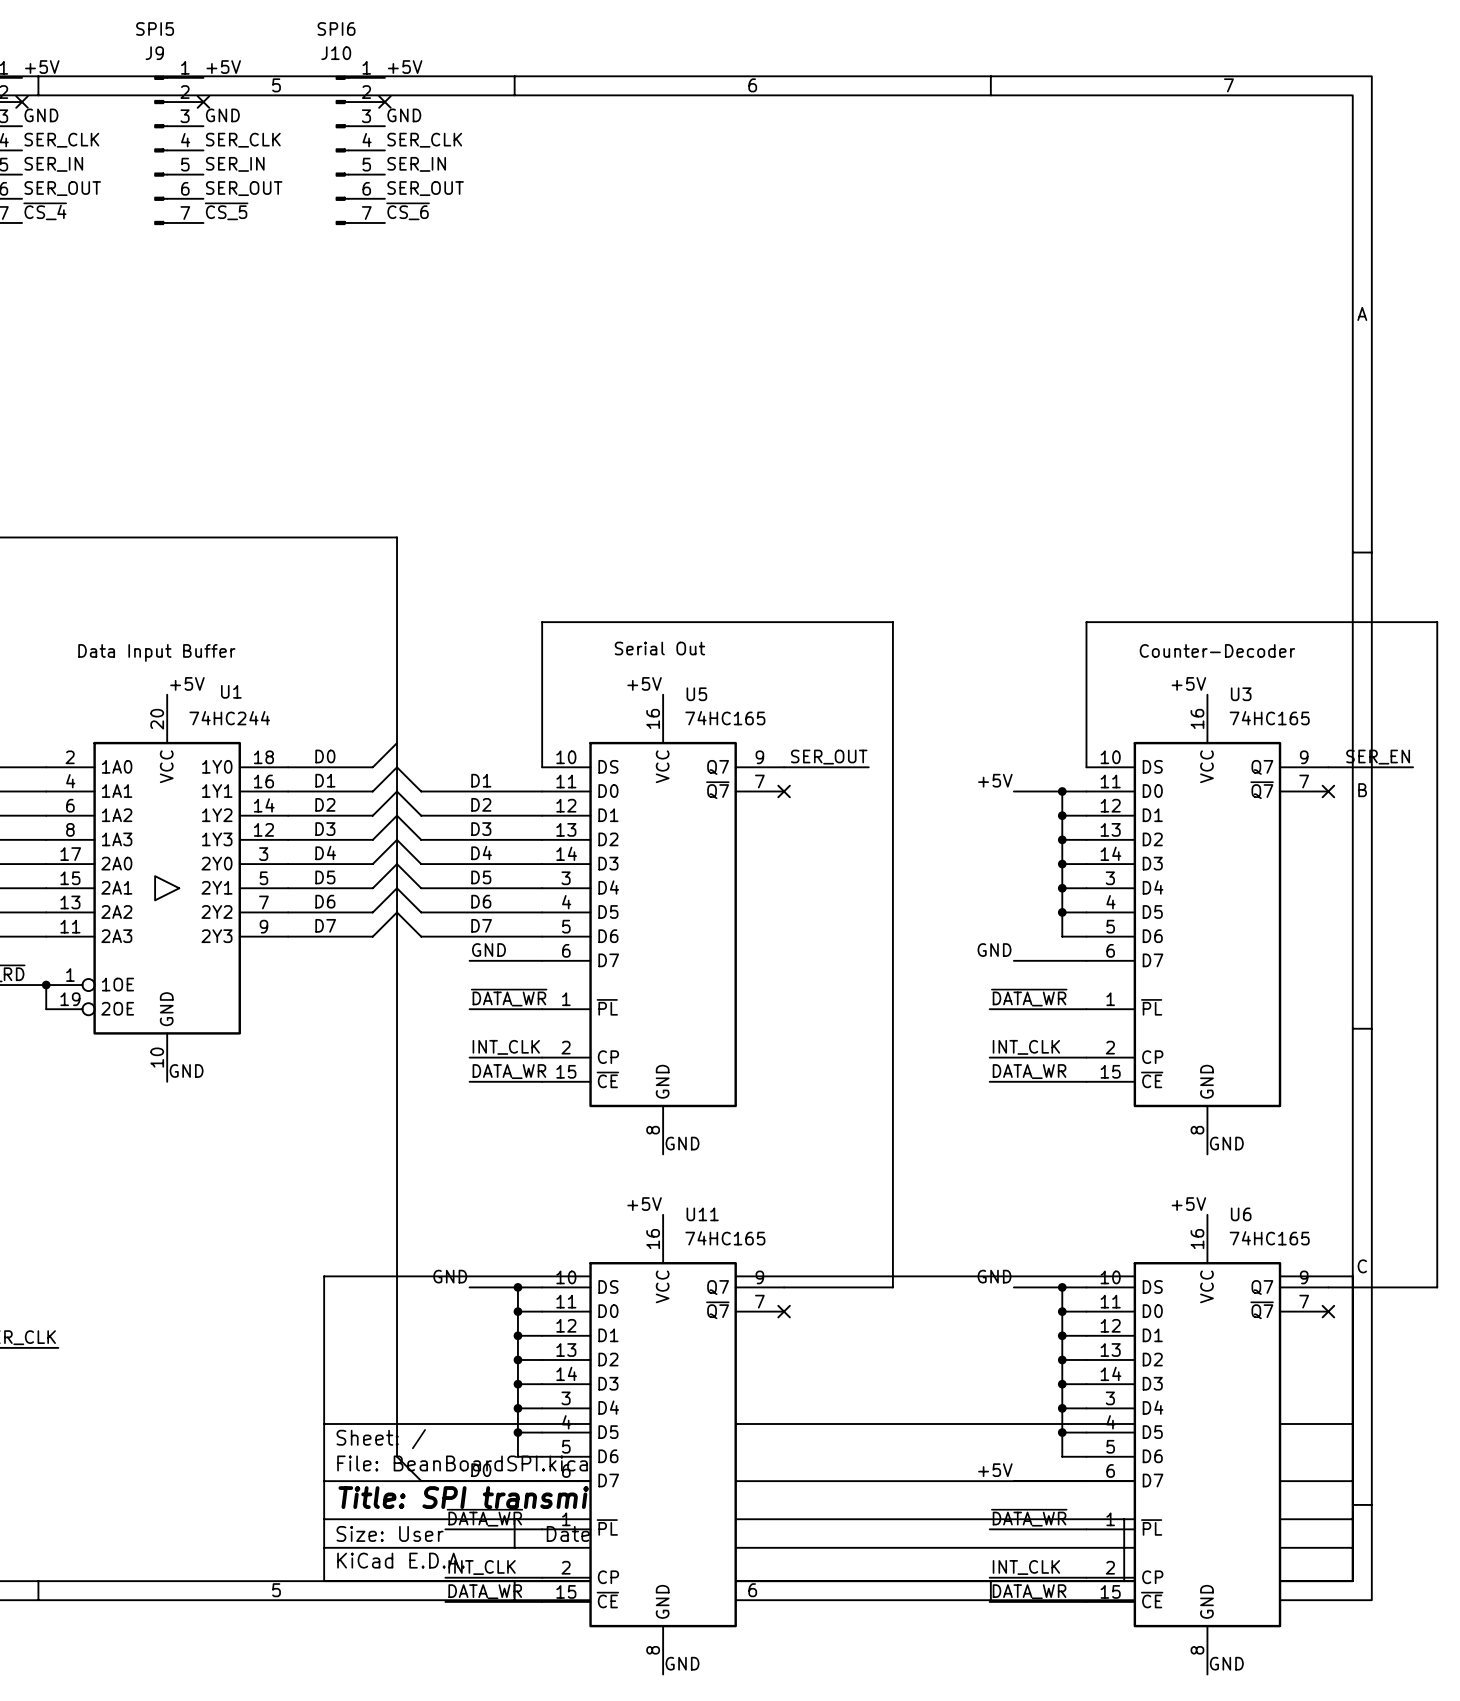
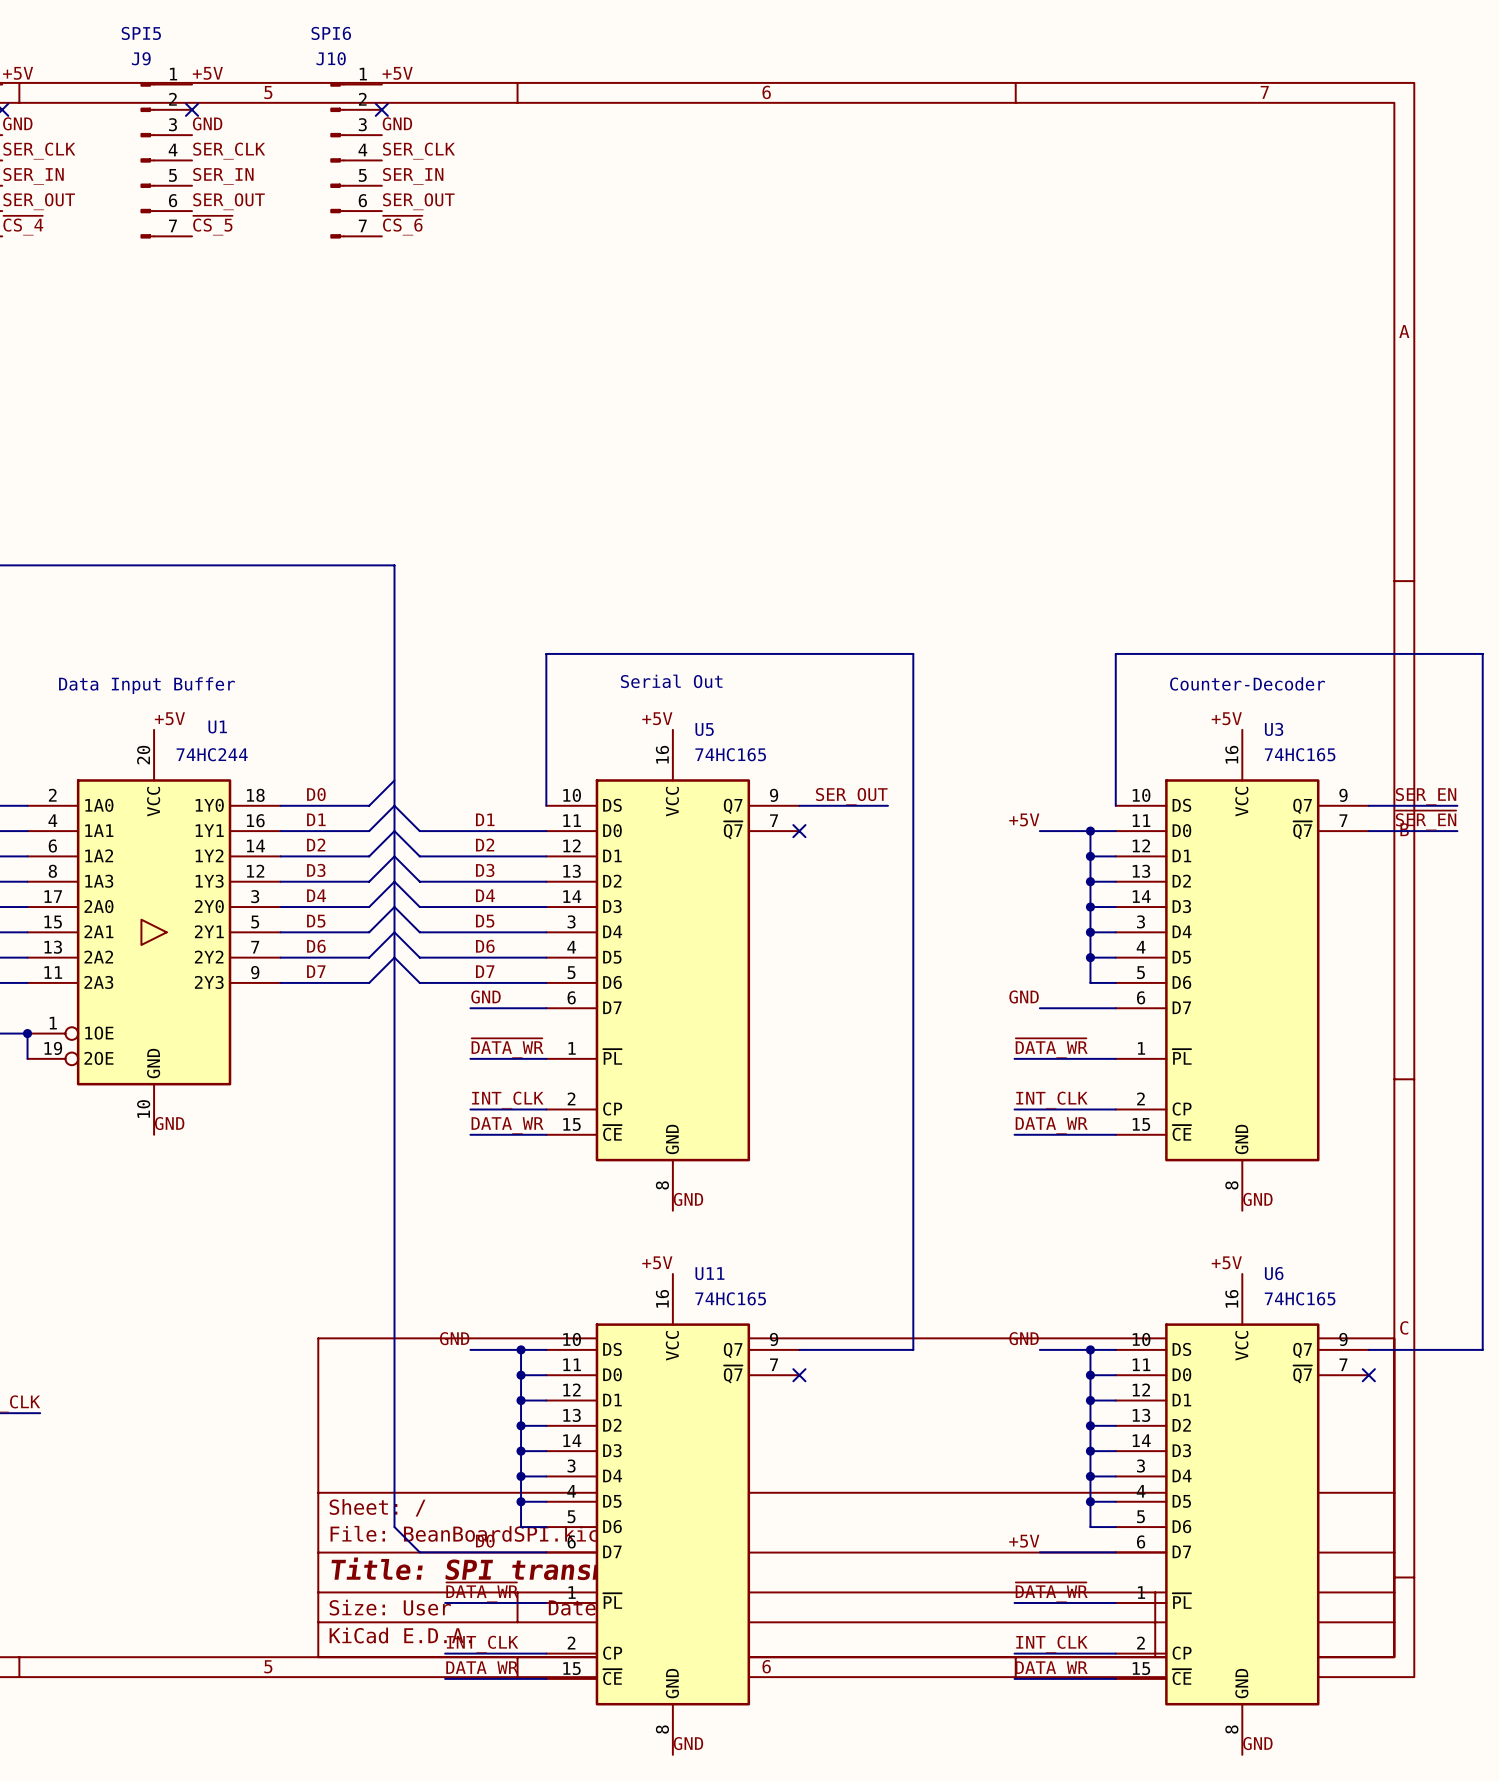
label: none -> ~{SER_EN} (1426, 820)
wire: none -> (1368, 831) (1457, 831)
no-connect mark: (1328, 791) -> none

